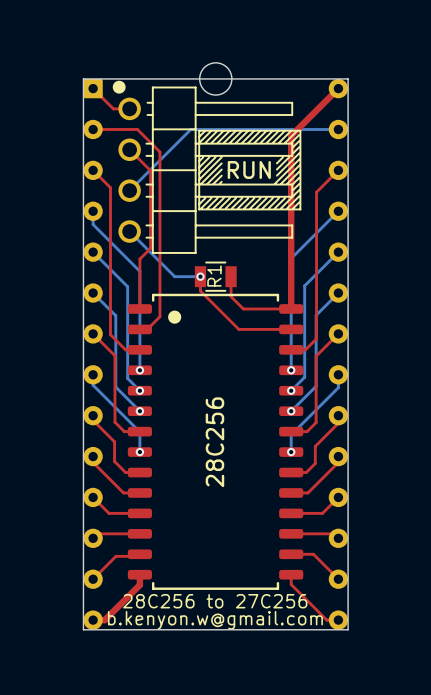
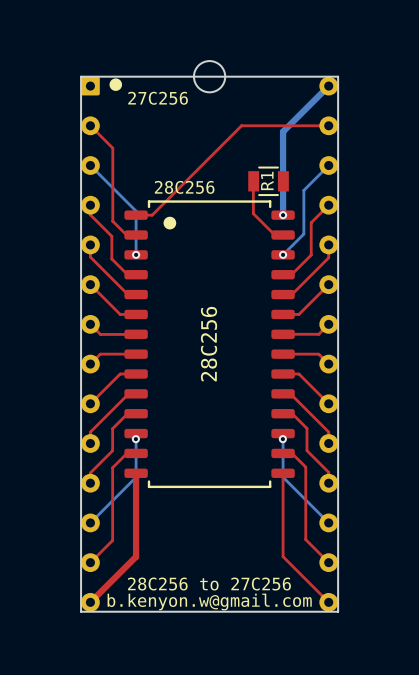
top track: (93, 88) (113, 108) (129, 108) -> none
top track: (338, 88) (291, 135) (291, 308) (243, 308) (231, 296) (231, 276) -> none
bottom track: none -> (328, 86) (283, 131) (283, 215)
text: none -> 27C256 (158, 98)
top track: (93, 129) (137, 129) (159, 151) (159, 316) (147, 329) (139, 329) -> (90, 125) (112, 148) (112, 221) (126, 235) (136, 235)
top track: none -> (328, 125) (241, 125) (152, 215) (136, 215)
bottom track: (338, 129) (190, 129) (129, 190) -> none
line: (199, 130) (300, 130) (300, 209) (199, 209) (199, 130) -> none
line: (205, 130) (199, 136) -> none
line: (211, 130) (199, 142) -> none
line: (217, 130) (205, 142) -> none
line: (223, 130) (211, 142) -> none
line: (229, 130) (217, 142) -> none
line: (236, 130) (223, 142) -> none
line: (242, 130) (229, 142) -> none
line: (248, 130) (236, 142) -> none
line: (254, 130) (242, 142) -> none
line: (260, 130) (248, 142) -> none
line: (266, 130) (254, 142) -> none
line: (272, 130) (260, 142) -> none
line: (278, 130) (266, 142) -> none
line: (285, 130) (272, 142) -> none
line: (291, 130) (278, 142) -> none
line: (297, 130) (285, 142) -> none
line: (299, 134) (291, 142) -> none
line: (299, 140) (293, 147) -> none
line: (299, 147) (293, 153) -> none
top track: (129, 149) (150, 170) (150, 248) (139, 259) (139, 308) -> none
line: (299, 153) (276, 175) -> none
line: (203, 157) (199, 161) -> none
line: (209, 157) (199, 167) -> none
line: (215, 157) (199, 173) -> none
line: (221, 157) (199, 179) -> none
line: (283, 157) (276, 163) -> none
line: (289, 157) (276, 169) -> none
line: (299, 159) (274, 183) -> none
line: (221, 163) (201, 183) -> none
line: (299, 165) (280, 183) -> none
line: (221, 169) (207, 183) -> none
top track: (93, 170) (110, 187) (110, 334) (125, 349) (139, 349) -> none
bottom track: none -> (90, 165) (136, 211) (136, 254)
part: (205, 170) -> none
text: RUN (249, 170) -> none
top track: (338, 170) (316, 192) (316, 338) (305, 349) (291, 349) -> none
bottom track: none -> (328, 165) (303, 190) (303, 234) (283, 254)
line: (299, 171) (287, 183) -> none
line: (221, 175) (213, 183) -> none
line: (299, 177) (293, 183) -> none
line: (221, 181) (219, 183) -> none
line: (299, 183) (293, 190) -> none
top track: none -> (253, 181) (253, 213) (274, 235) (283, 235)
line: (299, 190) (280, 208) -> none
text: none -> 28C256 (184, 187)
line: (299, 196) (287, 208) -> none
line: (205, 198) (199, 204) -> none
line: (211, 198) (201, 208) -> none
line: (217, 198) (207, 208) -> none
line: (223, 198) (213, 208) -> none
line: (229, 198) (219, 208) -> none
line: (236, 198) (225, 208) -> none
line: (242, 198) (231, 208) -> none
line: (248, 198) (238, 208) -> none
line: (254, 198) (244, 208) -> none
line: (260, 198) (250, 208) -> none
line: (266, 198) (256, 208) -> none
line: (272, 198) (262, 208) -> none
line: (278, 198) (268, 208) -> none
line: (285, 198) (274, 208) -> none
line: (299, 202) (293, 208) -> none
top track: none -> (90, 205) (90, 214) (111, 236) (111, 259) (127, 274) (136, 274)
bottom track: (93, 211) (93, 224) (139, 271) (139, 370) -> none
top track: none -> (328, 205) (311, 222) (311, 255) (291, 274) (283, 274)
bottom track: (338, 211) (291, 258) (291, 370) -> none
via: none -> (283, 215)
bottom track: (129, 231) (174, 276) (200, 276) -> none
top track: none -> (90, 244) (90, 257) (127, 294) (136, 294)
bottom track: (93, 252) (127, 286) (127, 378) (139, 390) -> none
top track: none -> (328, 244) (328, 257) (291, 294) (283, 294)
bottom track: (338, 252) (304, 285) (304, 377) (291, 390) -> none
via: none -> (136, 254)
via: none -> (283, 254)
top track: (200, 276) (200, 291) (238, 329) (291, 329) -> none
via: (200, 276) -> none
R1 position: (215, 276) -> (268, 181)
top track: none -> (90, 284) (120, 314) (136, 314)
bottom track: (93, 293) (115, 315) (115, 387) (139, 411) -> none
top track: none -> (328, 284) (298, 314) (283, 314)
bottom track: (338, 293) (316, 315) (316, 386) (291, 411) -> none
top track: (103, 344) (114, 355) (114, 422) (124, 431) (139, 431) -> (100, 334) (135, 334)
top track: (328, 344) (316, 356) (316, 422) (307, 431) (291, 431) -> (318, 334) (283, 334)
top track: none -> (136, 354) (100, 354) (90, 364)
top track: none -> (283, 354) (318, 354) (328, 364)
via: (139, 370) -> none
via: (291, 370) -> none
bottom track: (93, 374) (93, 385) (139, 432) (139, 452) -> none
bottom track: (338, 374) (338, 387) (291, 434) (291, 452) -> none
via: (139, 390) -> none
via: (291, 390) -> none
via: (139, 411) -> none
via: (291, 411) -> none
top track: (93, 415) (93, 420) (114, 441) (114, 461) (125, 472) (139, 472) -> (90, 403) (120, 374) (136, 374)
top track: (338, 415) (338, 423) (315, 446) (315, 463) (306, 472) (291, 472) -> (328, 403) (298, 374) (283, 374)
part position: (215, 441) -> (209, 344)
bottom track: none -> (136, 433) (136, 477) (90, 522)
bottom track: none -> (283, 433) (283, 477) (328, 522)
top track: (93, 456) (93, 462) (123, 492) (139, 492) -> (90, 443) (90, 432) (128, 393) (136, 393)
top track: (338, 456) (338, 462) (307, 492) (291, 492) -> (328, 443) (328, 432) (290, 393) (283, 393)
top track: (93, 497) (109, 513) (139, 513) -> (90, 483) (90, 472) (112, 450) (112, 428) (127, 413) (136, 413)
top track: (338, 497) (322, 513) (291, 513) -> (328, 483) (328, 472) (307, 450) (307, 428) (292, 413) (283, 413)
top track: (139, 533) (97, 533) (93, 538) -> none
top track: (291, 533) (333, 533) (338, 538) -> none
top track: (139, 554) (137, 556) (115, 556) -> (136, 453) (126, 453) (112, 467) (112, 540)
top track: (291, 554) (314, 555) -> (283, 453) (292, 453) (305, 467) (305, 539)
top track: (139, 574) (139, 584) (104, 620) (93, 620) -> (136, 473) (136, 556) (90, 602)
top track: (291, 574) (291, 584) (326, 620) (338, 620) -> (283, 473) (283, 556) (328, 602)

